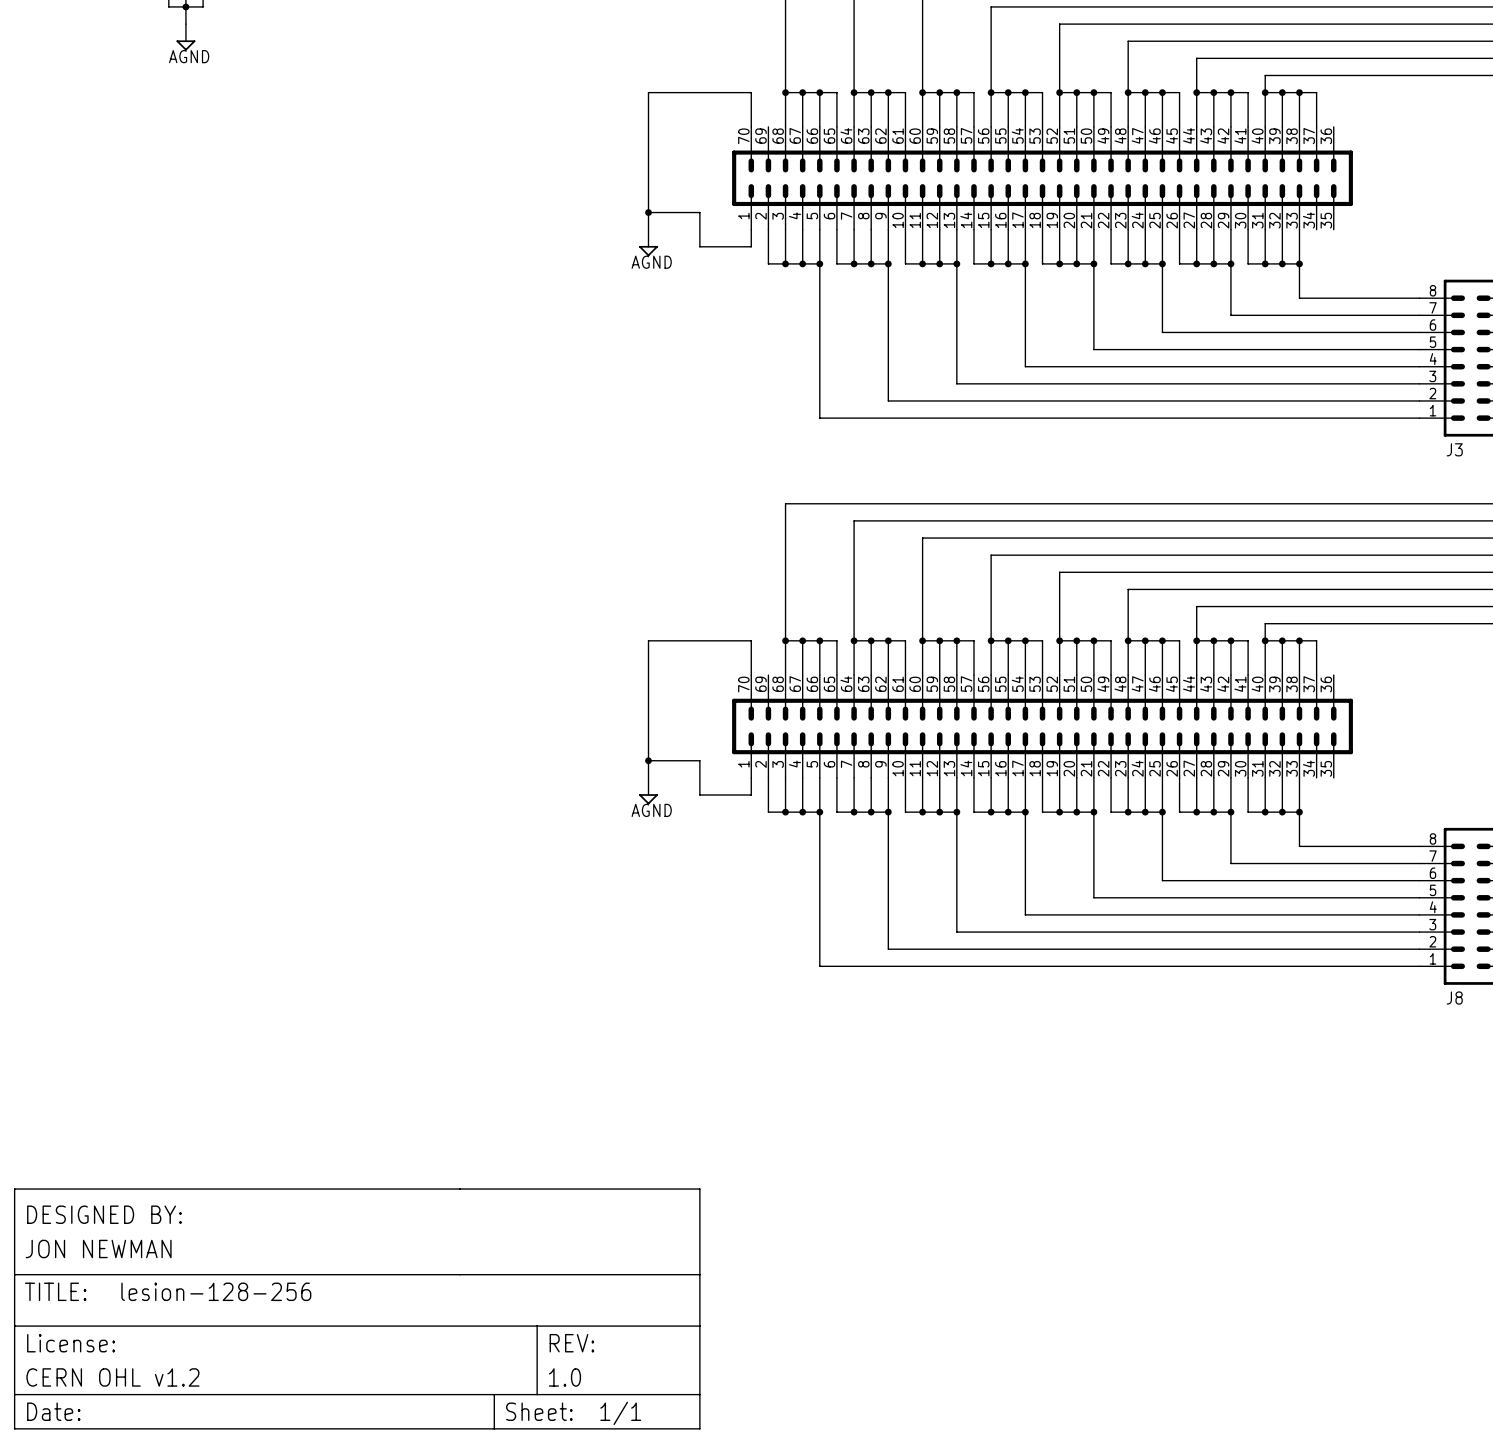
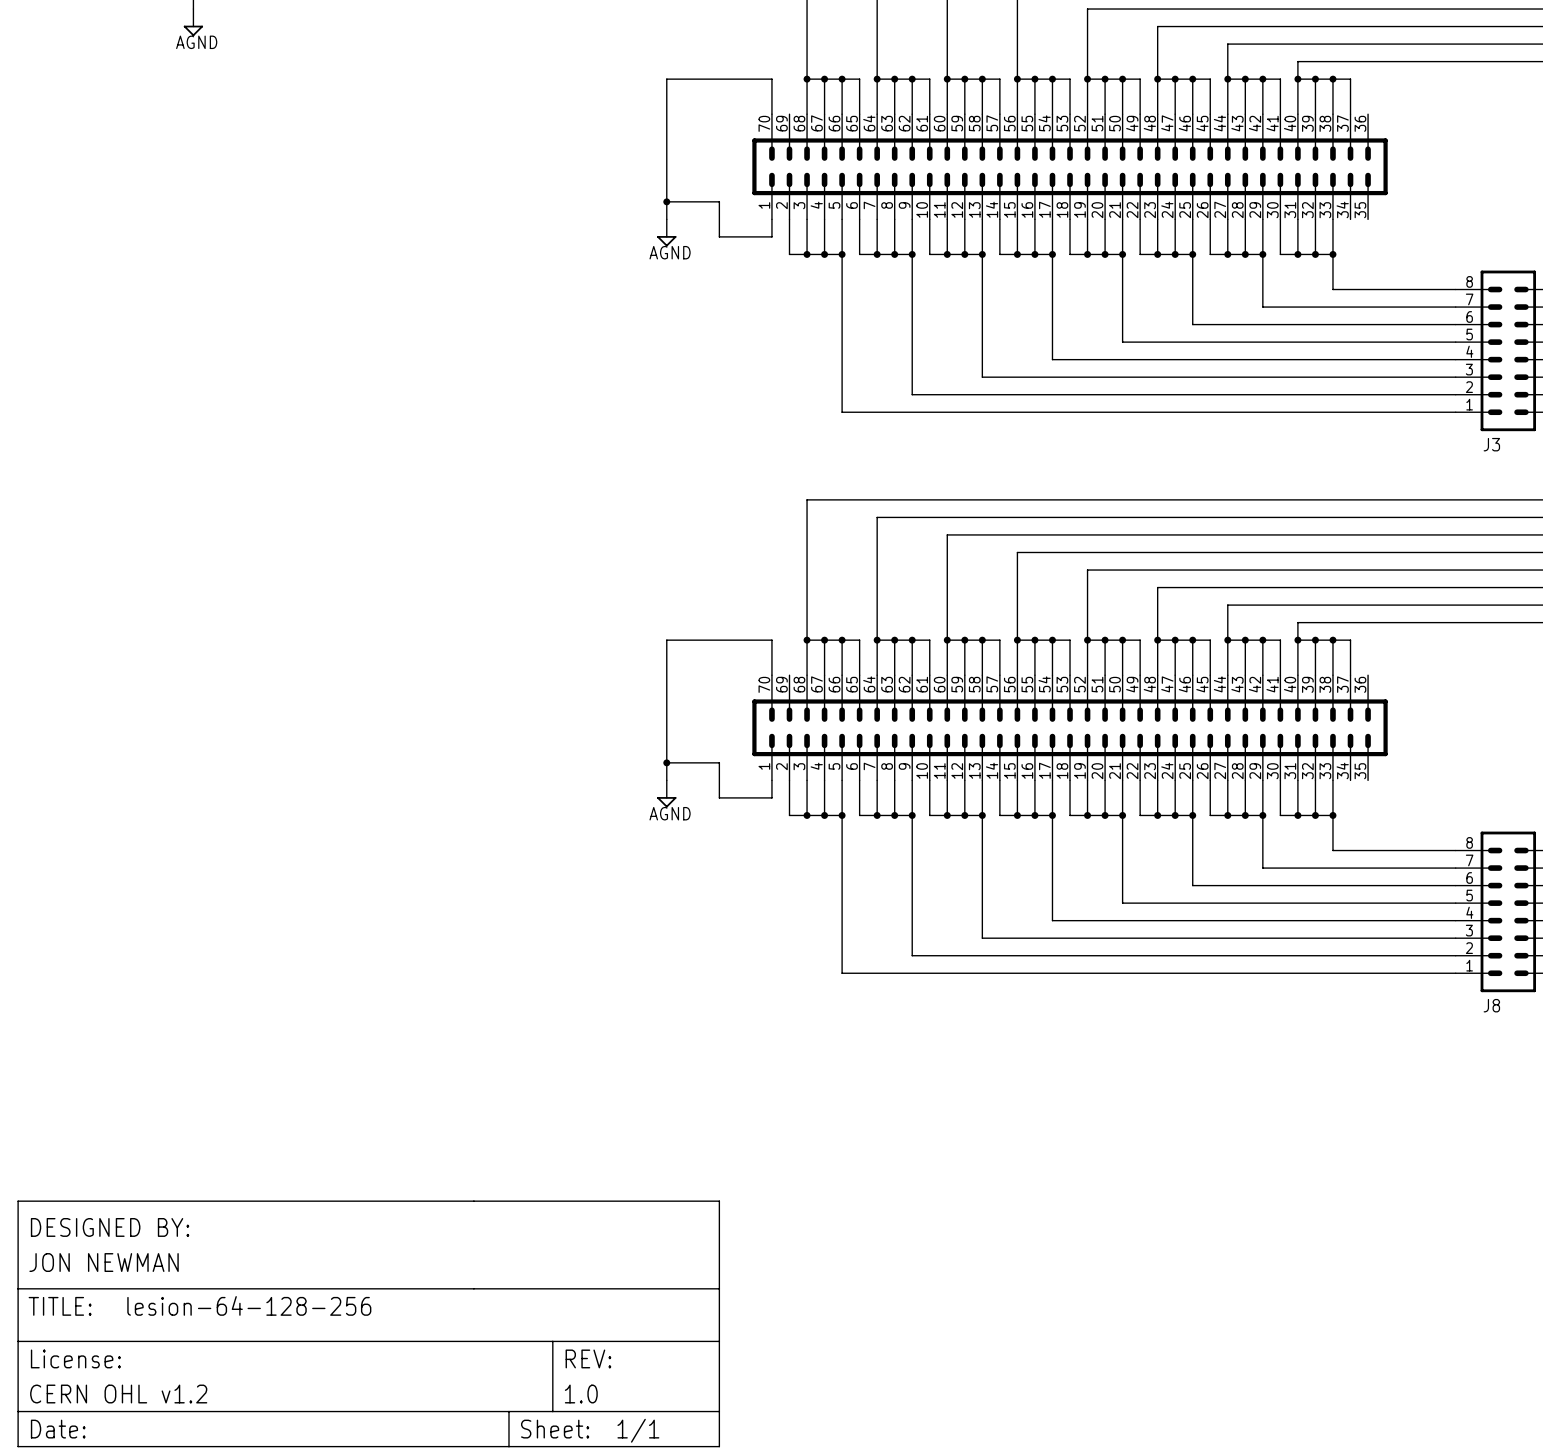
part text: lesion-128-256 (216, 1291) -> lesion-64-128-256 (249, 1305)

